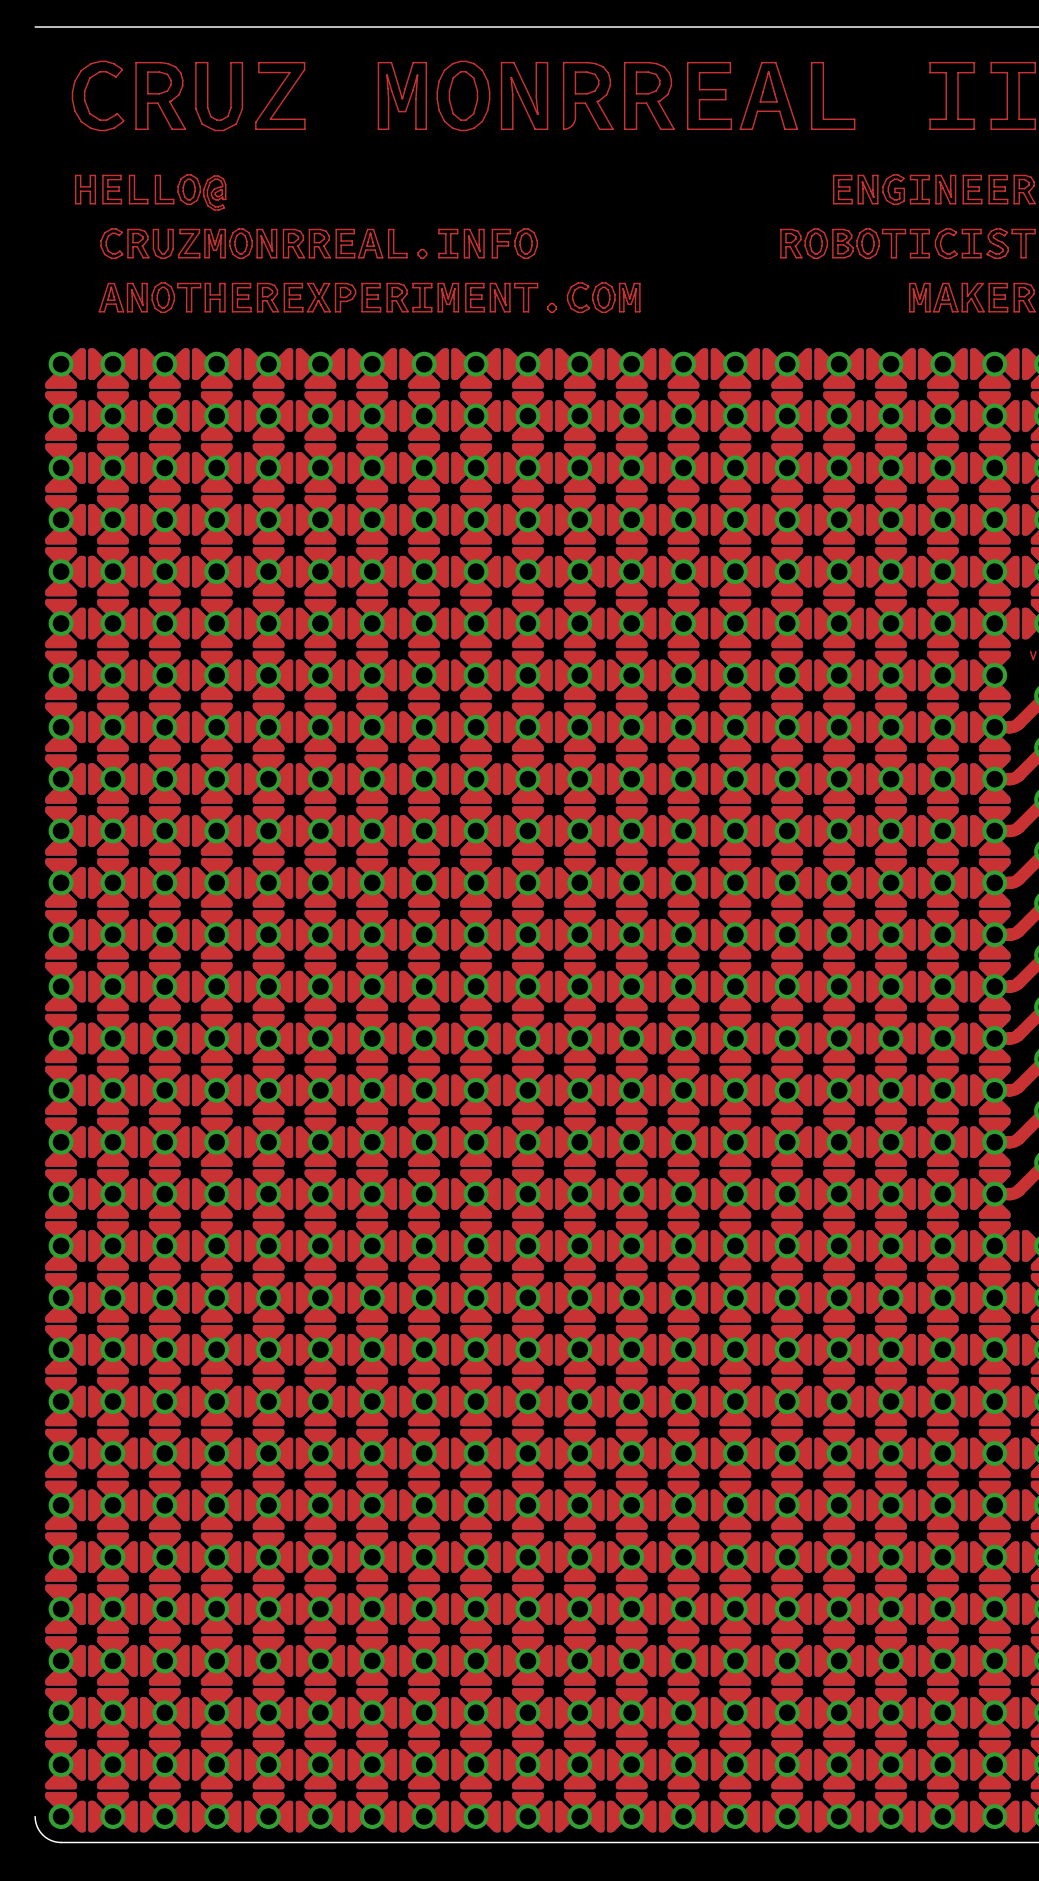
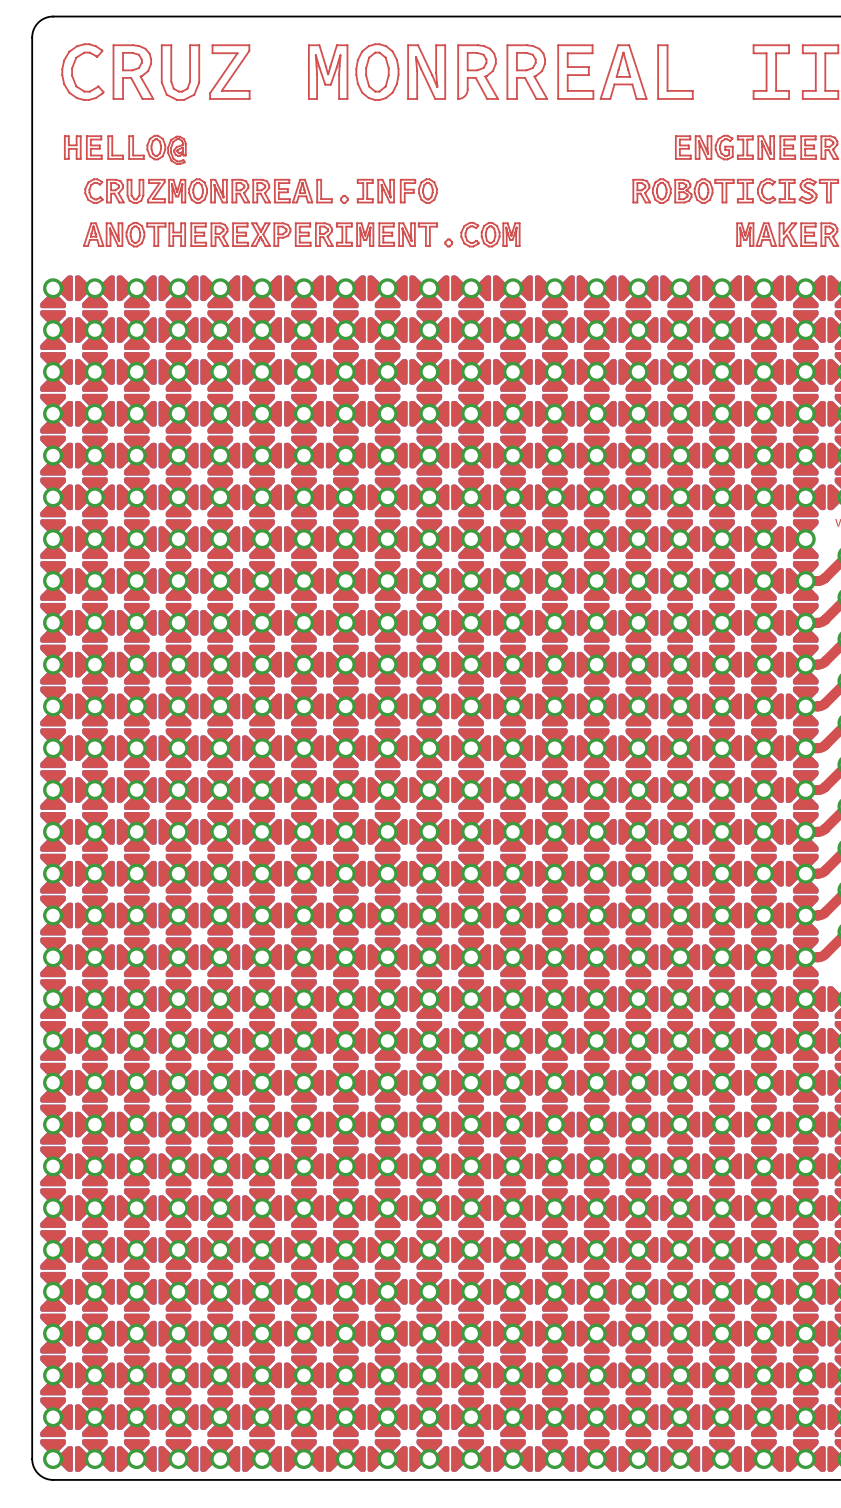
board edge: (35, 27) (61, 27) -> (32, 1459) (32, 37) (33, 29) (38, 22) (45, 18) (53, 16)

